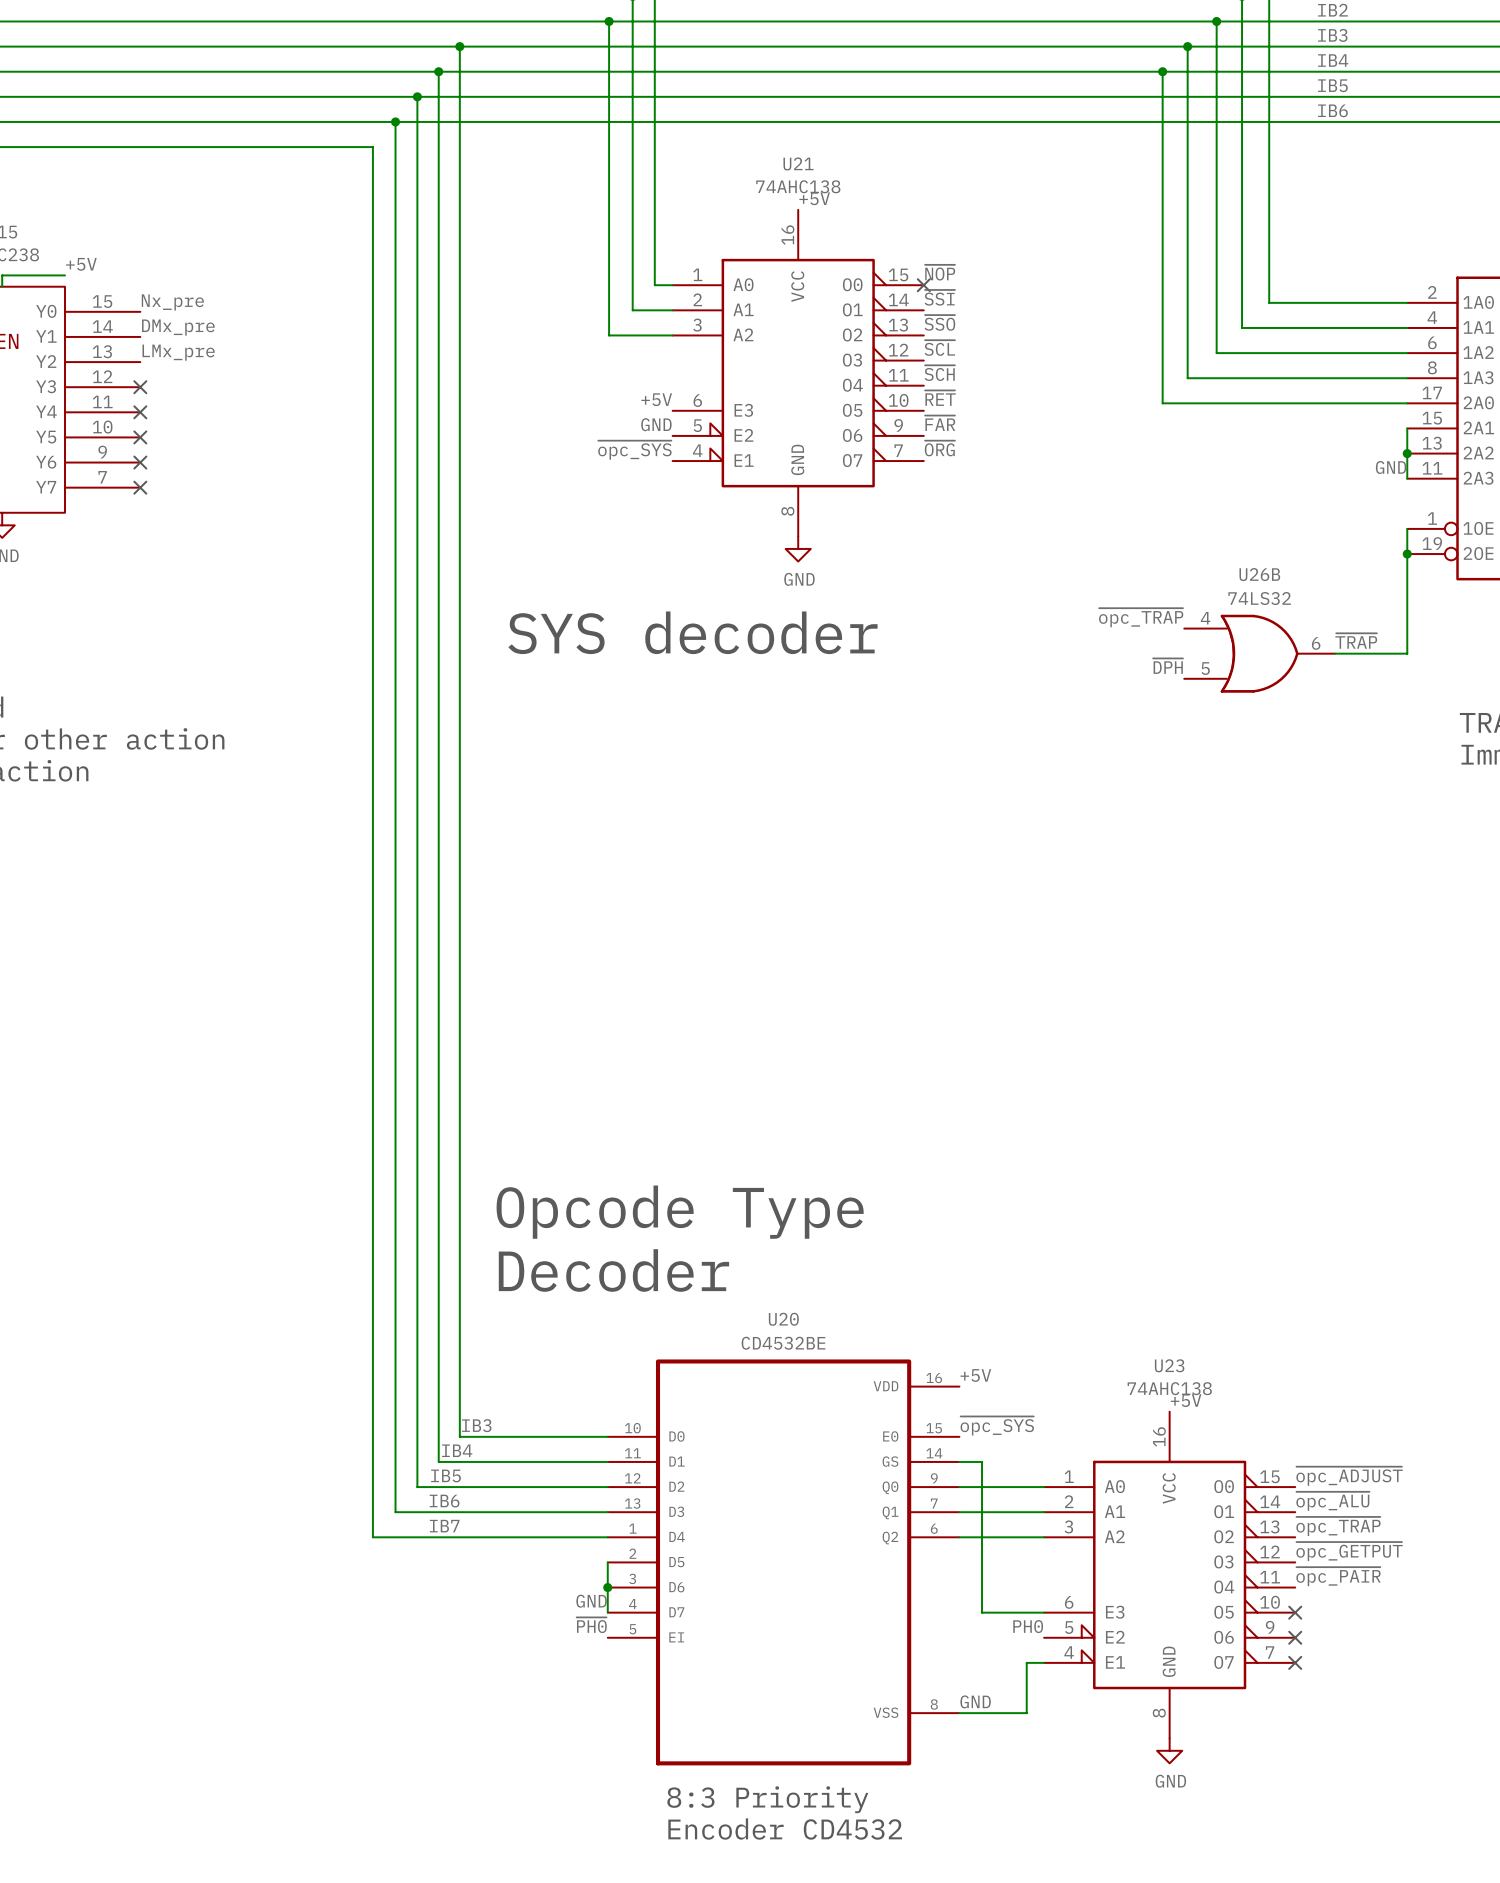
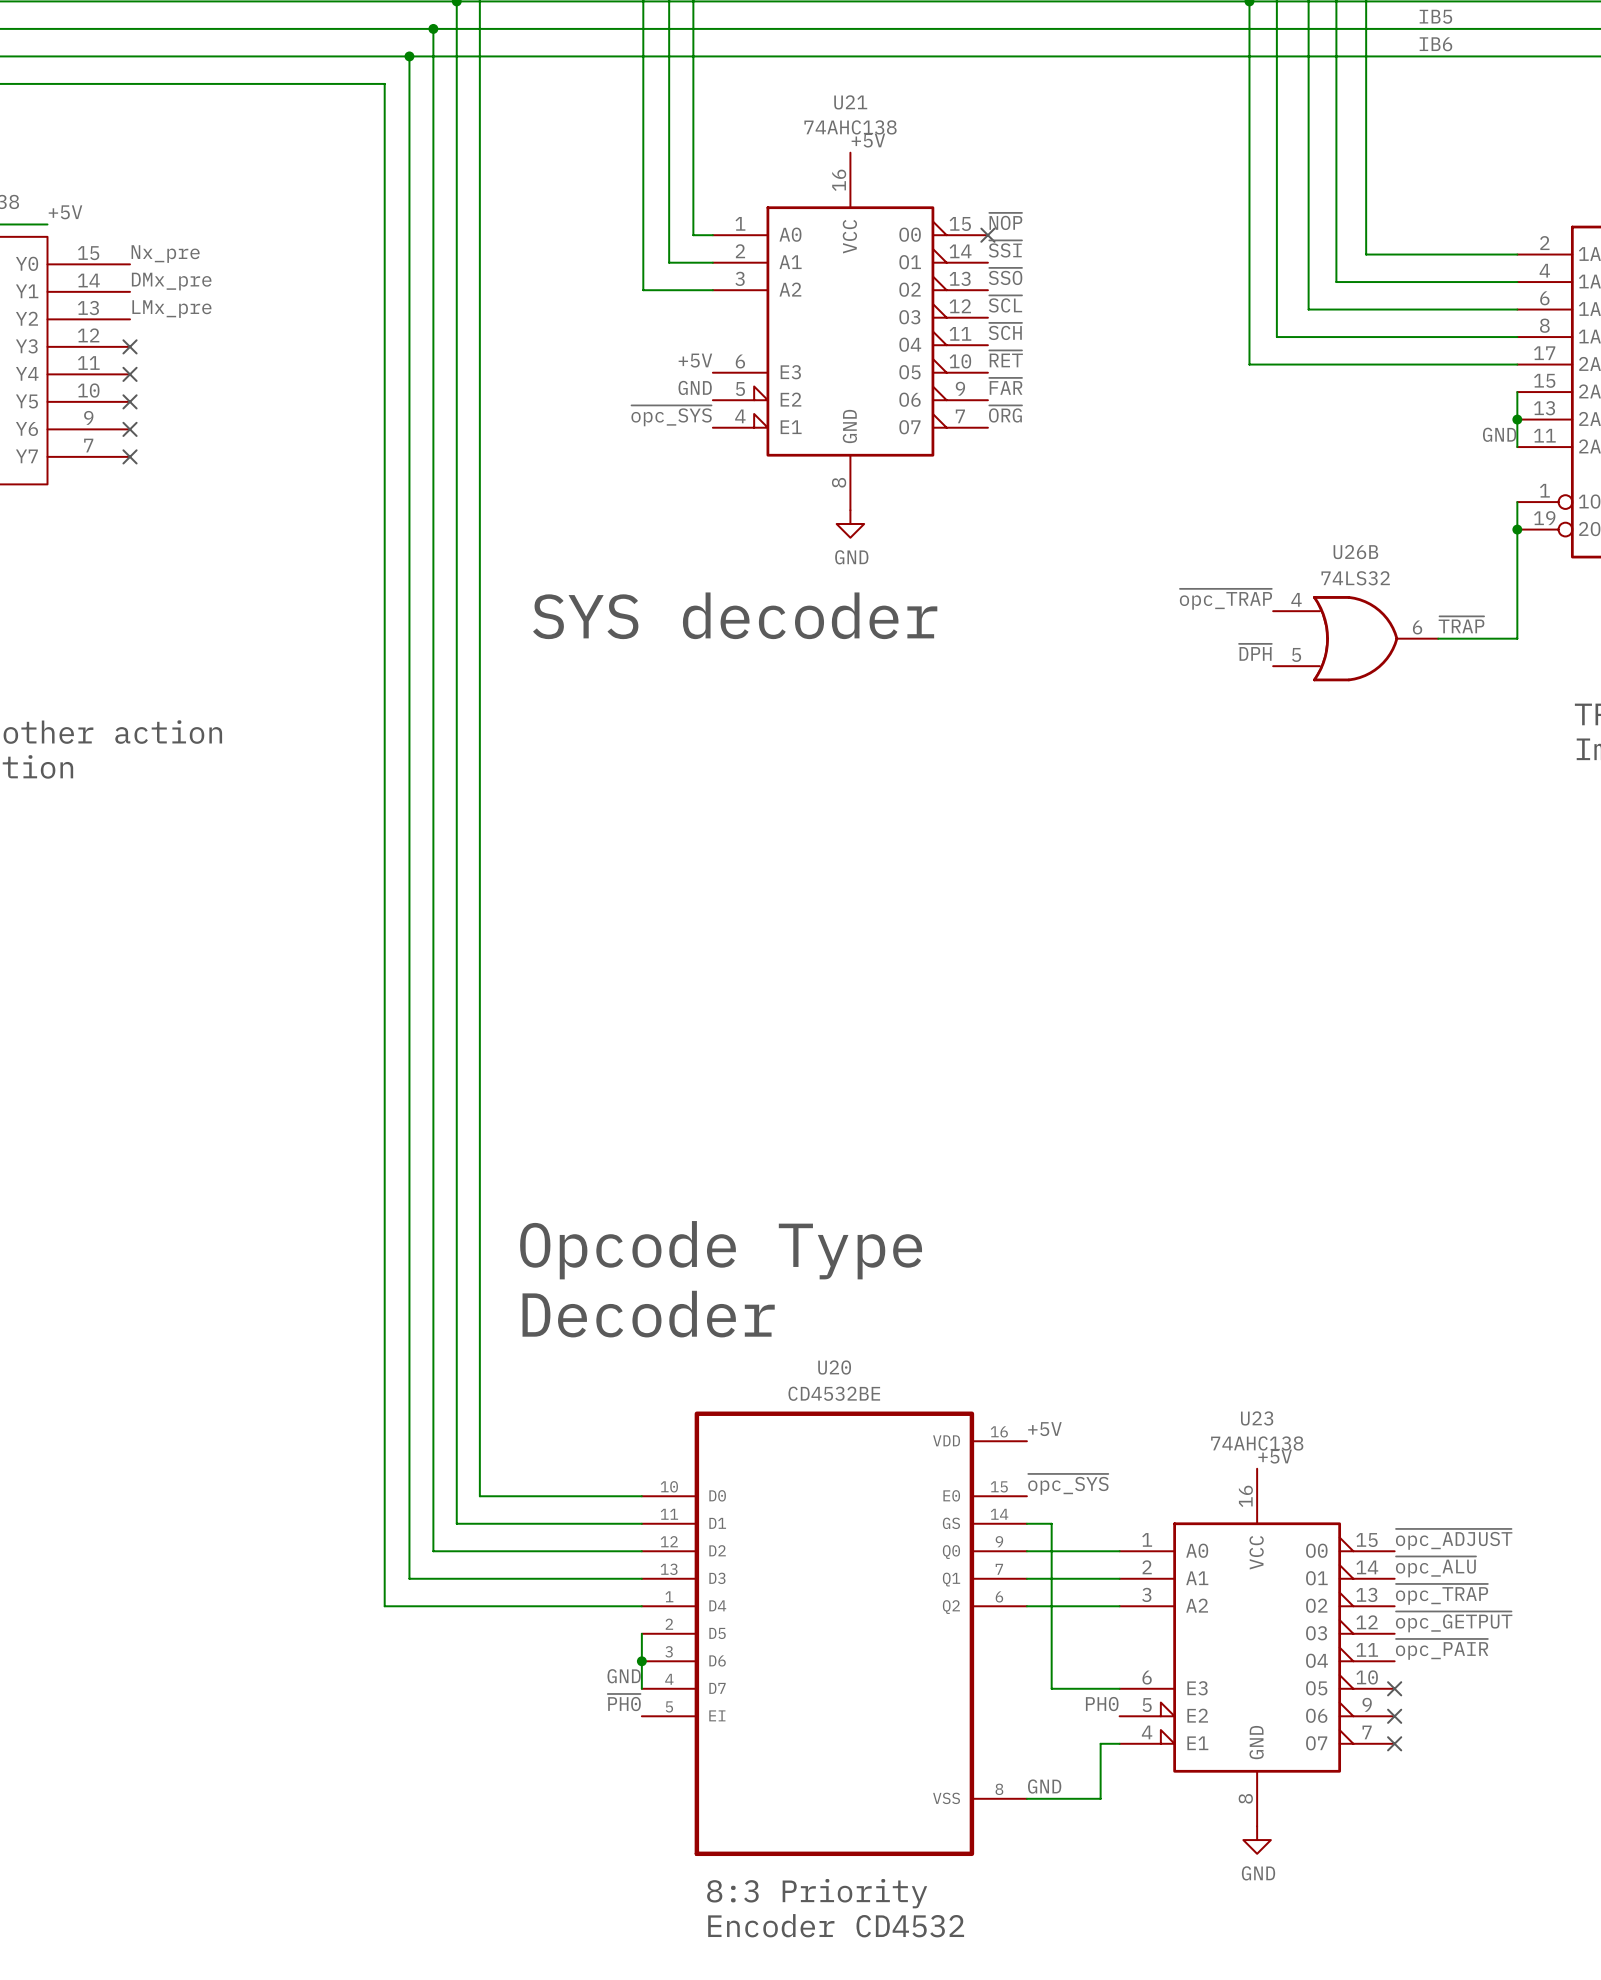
label: IB3 (476, 1425) -> none
label: IB4 (457, 1450) -> none
label: IB5 (445, 1475) -> none
label: IB6 (444, 1501) -> none
label: IB7 (444, 1526) -> none

